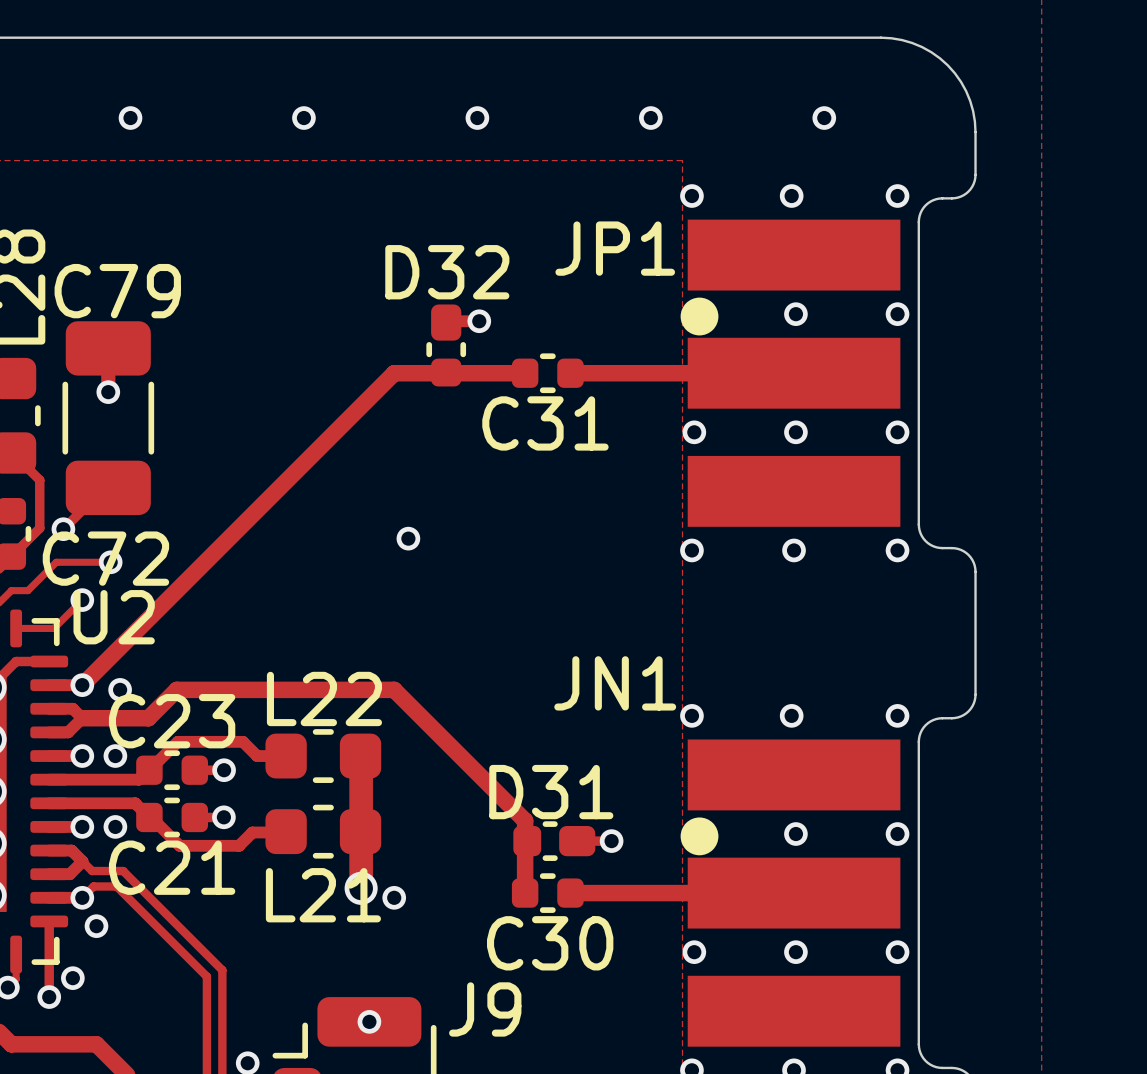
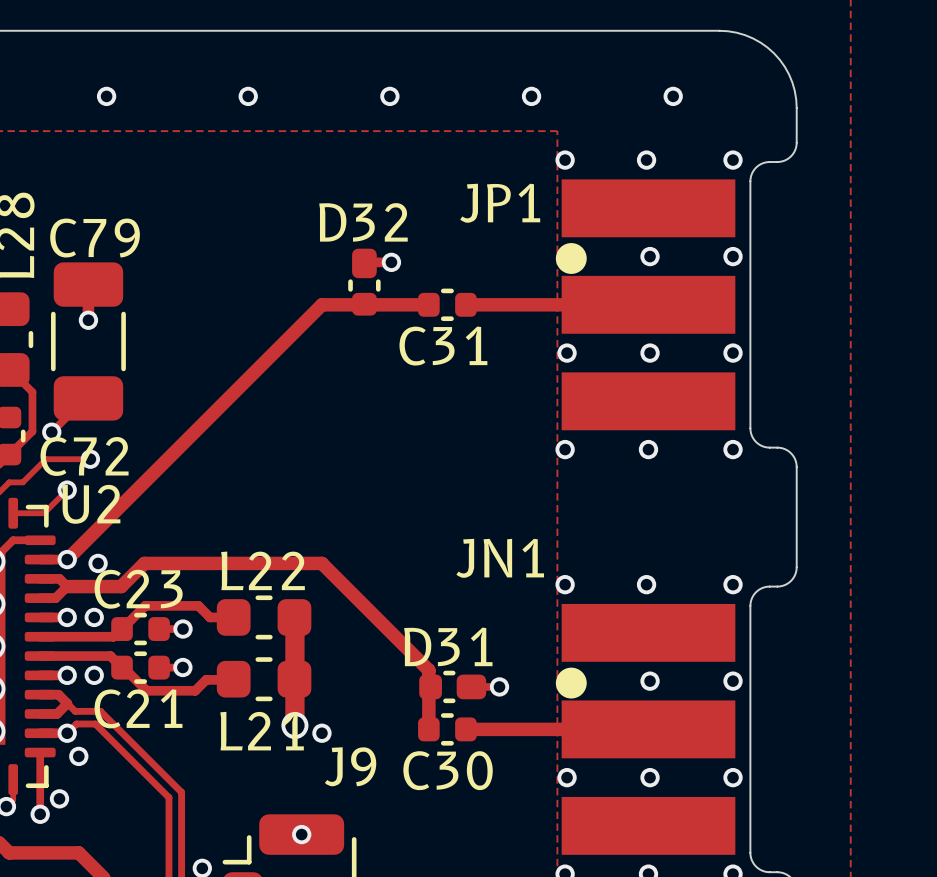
via: (408, 538) -> none
J9 name position: J9 (485, 1009) -> J9 (350, 766)

